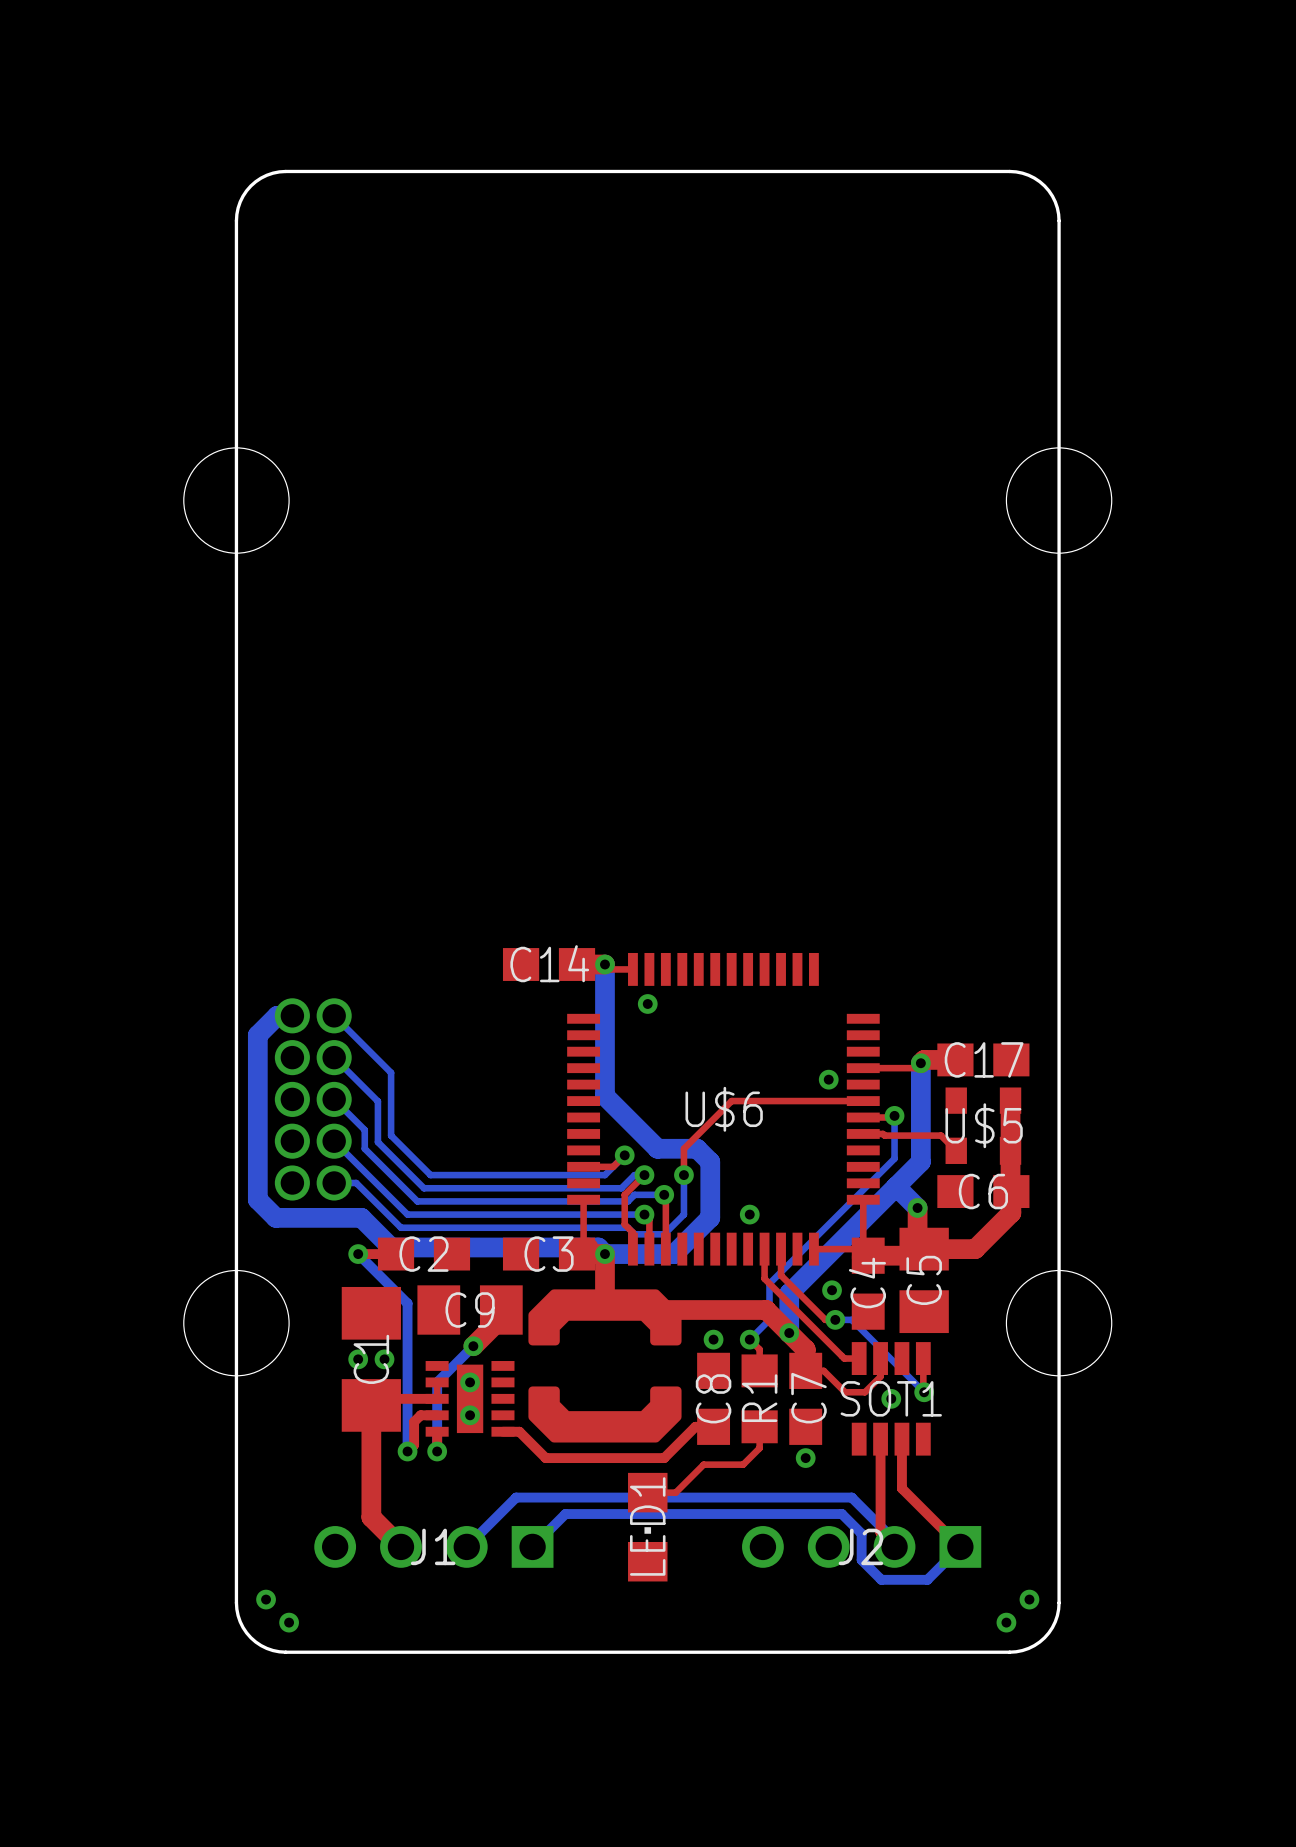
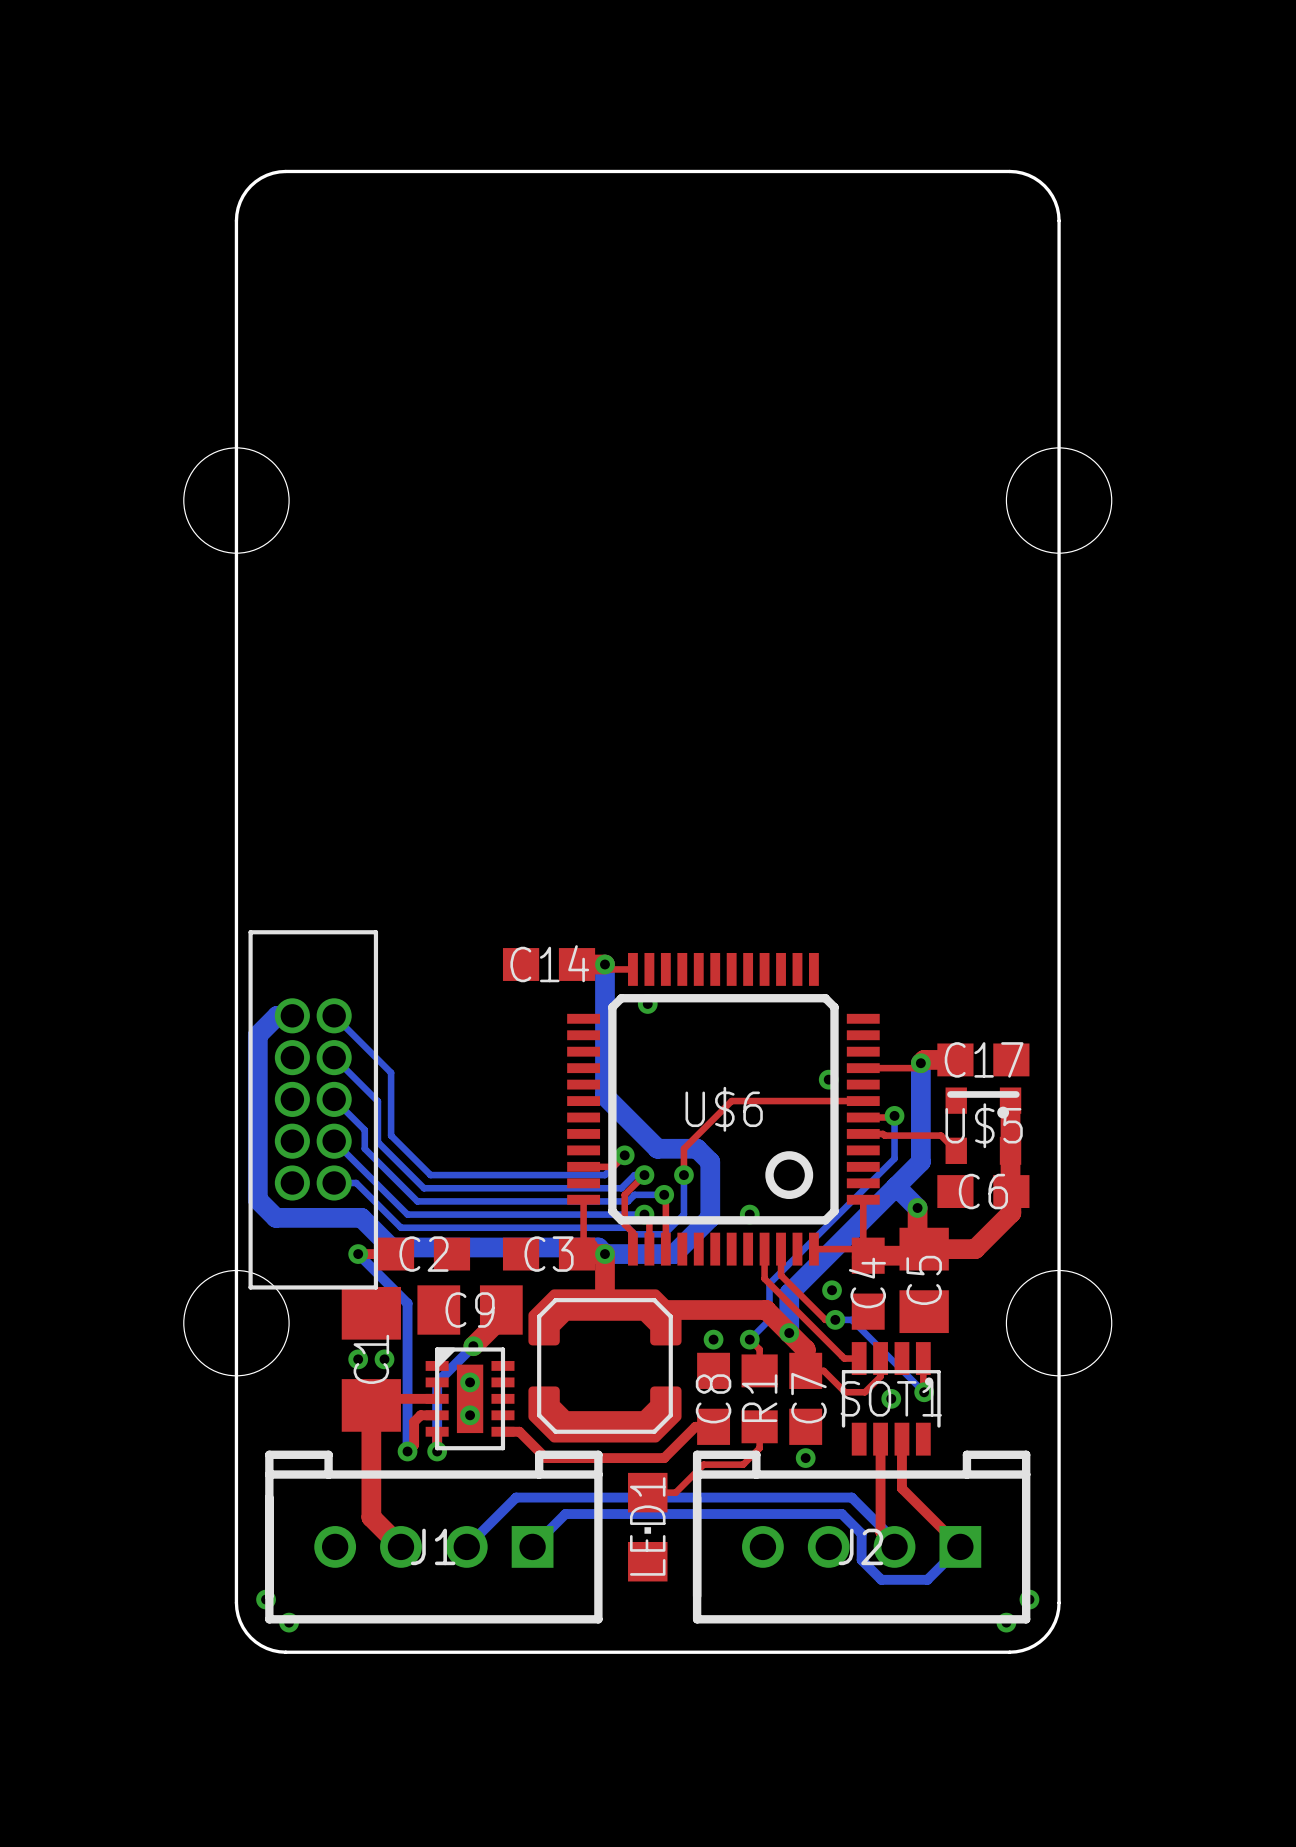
U$6 footprint: [567, 952, 880, 1266] -> [567, 952, 880, 1266]
part footprint: [274, 998, 352, 1201] -> [248, 930, 379, 1290]
U$5 footprint: [945, 1087, 1022, 1165] -> [945, 1087, 1022, 1165]
part footprint: [528, 1289, 682, 1443] -> [528, 1289, 682, 1443]
SOT1 footprint: [851, 1342, 931, 1456] -> [841, 1342, 941, 1456]
part footprint: [425, 1361, 515, 1437] -> [425, 1347, 515, 1451]
J1 footprint: [314, 1526, 554, 1568] -> [265, 1450, 603, 1624]
J2 footprint: [742, 1526, 982, 1568] -> [692, 1450, 1031, 1624]

